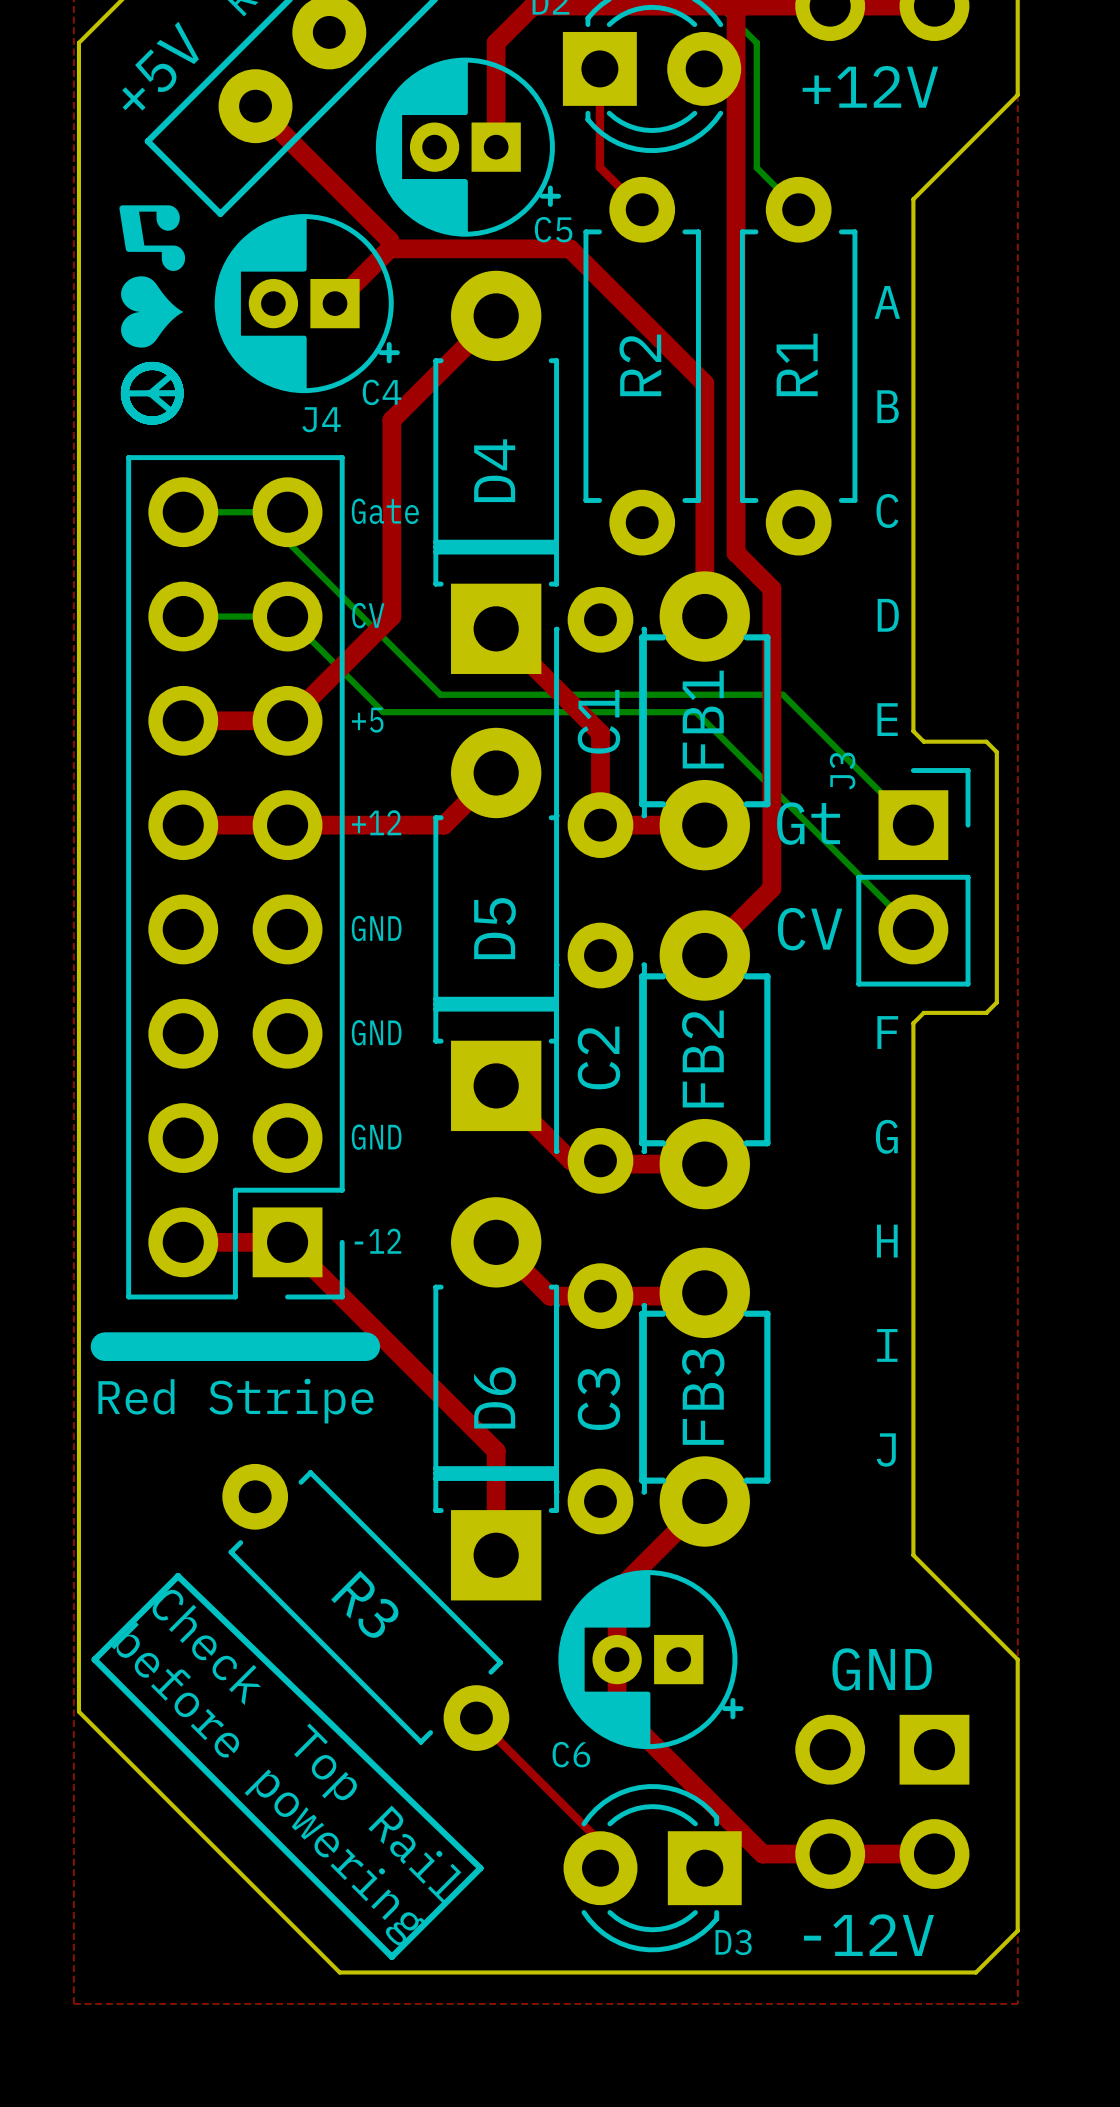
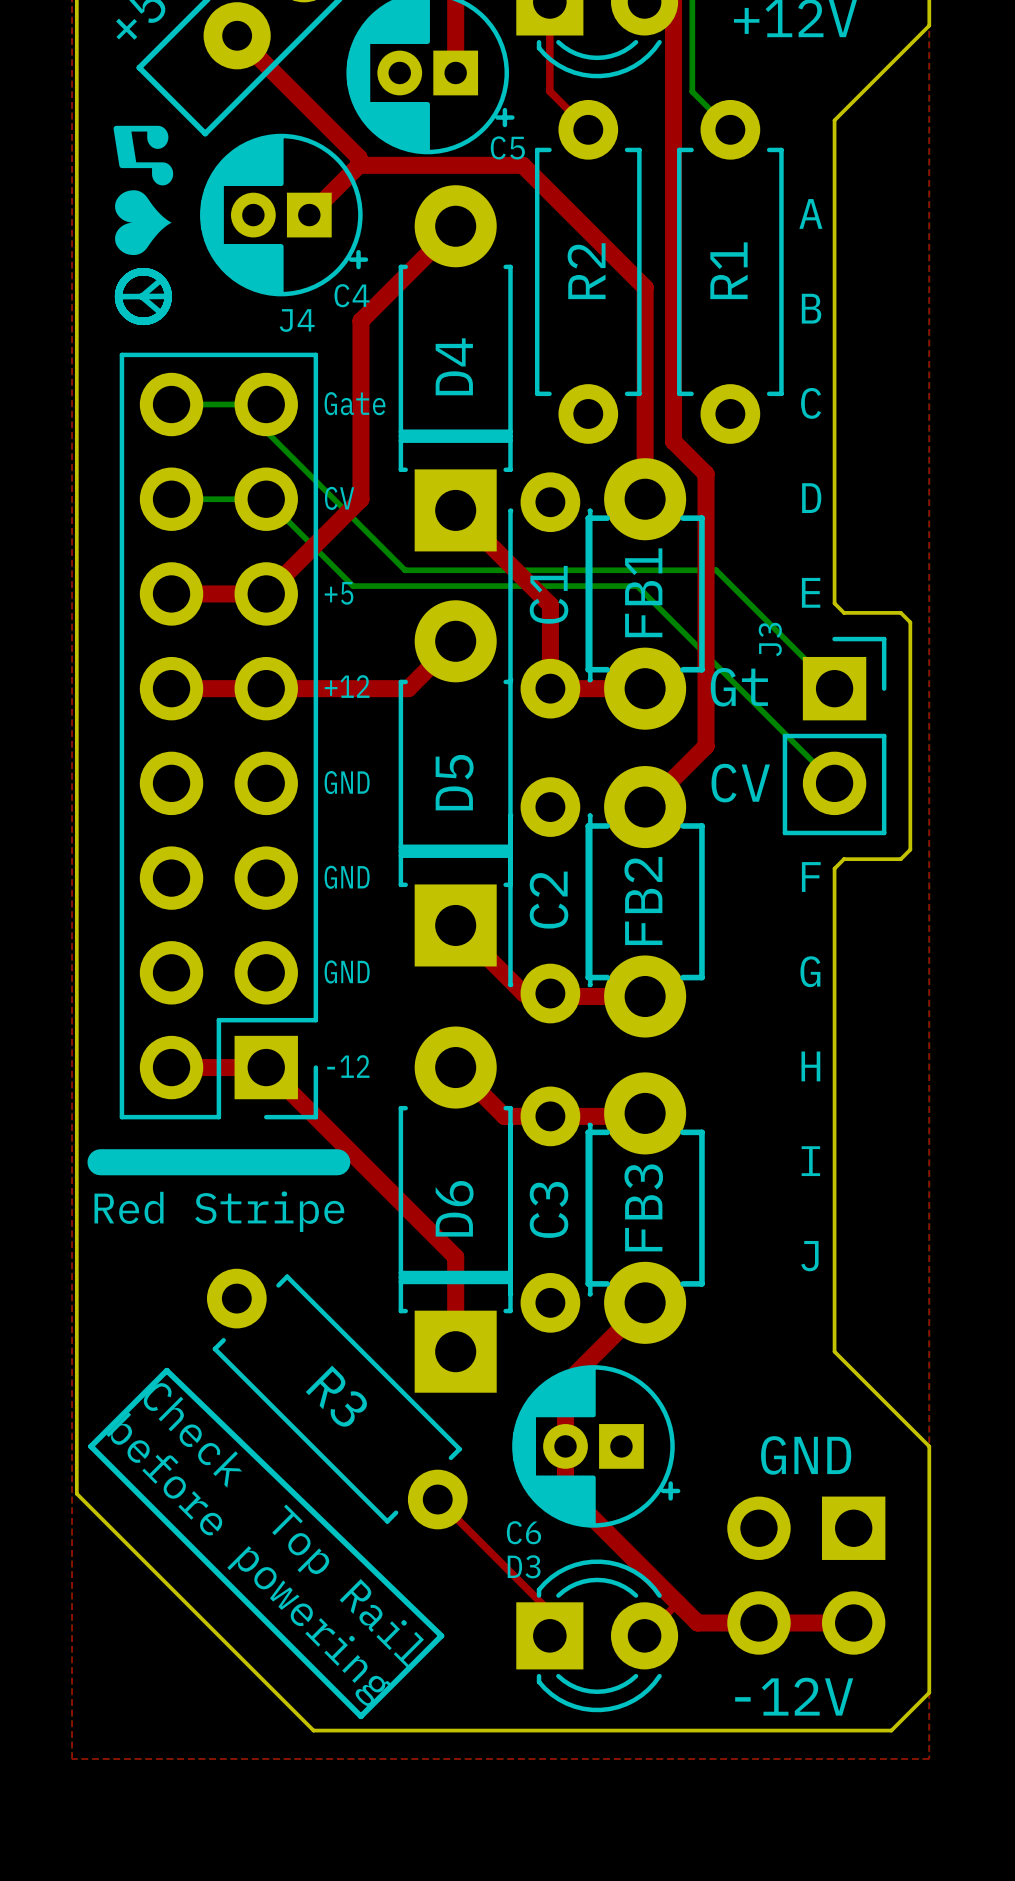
D3 rotation: 0° (652, 1868) -> 180° (597, 1635)

